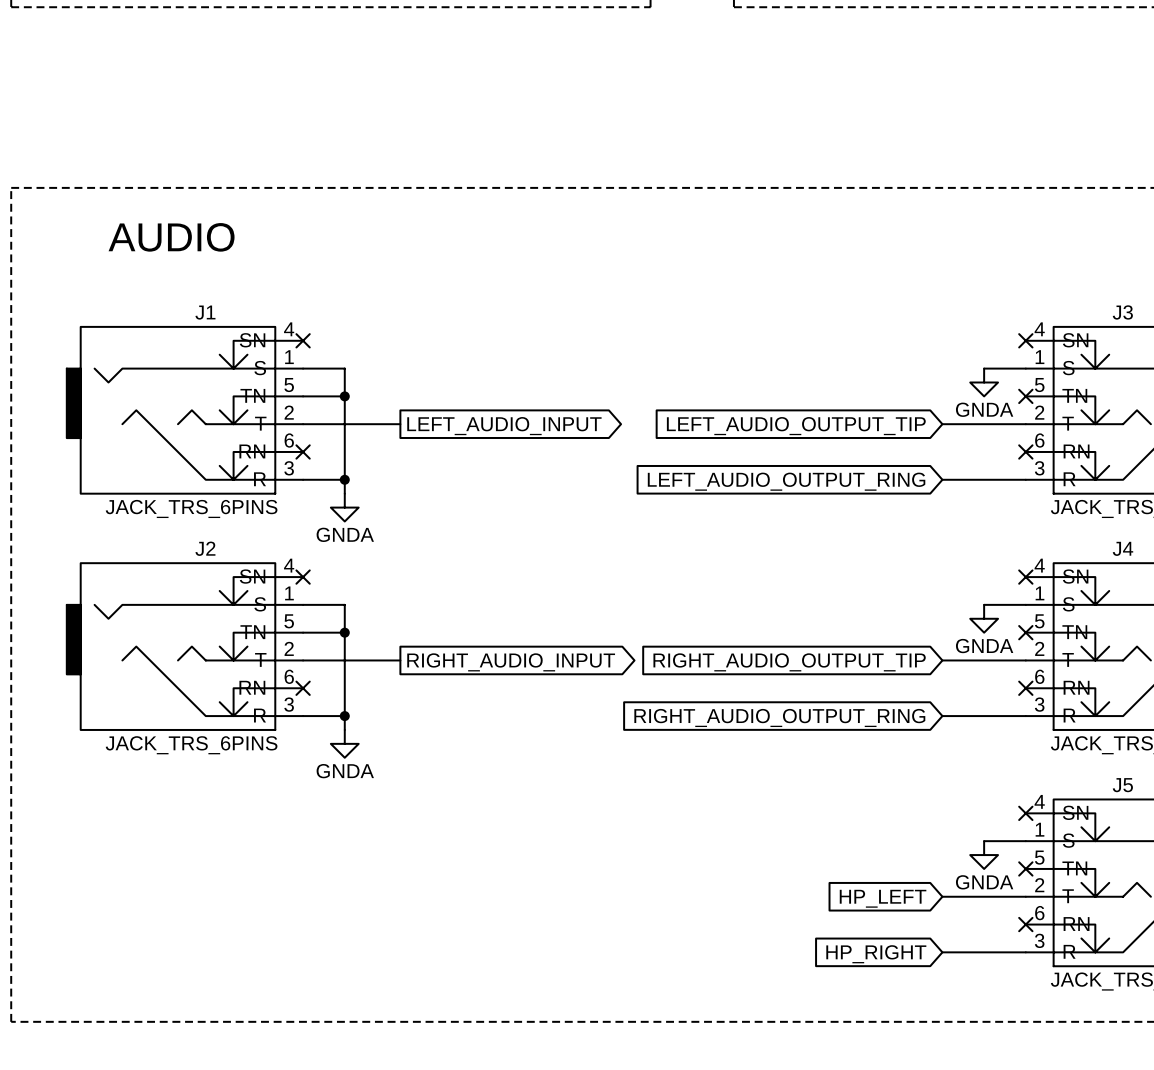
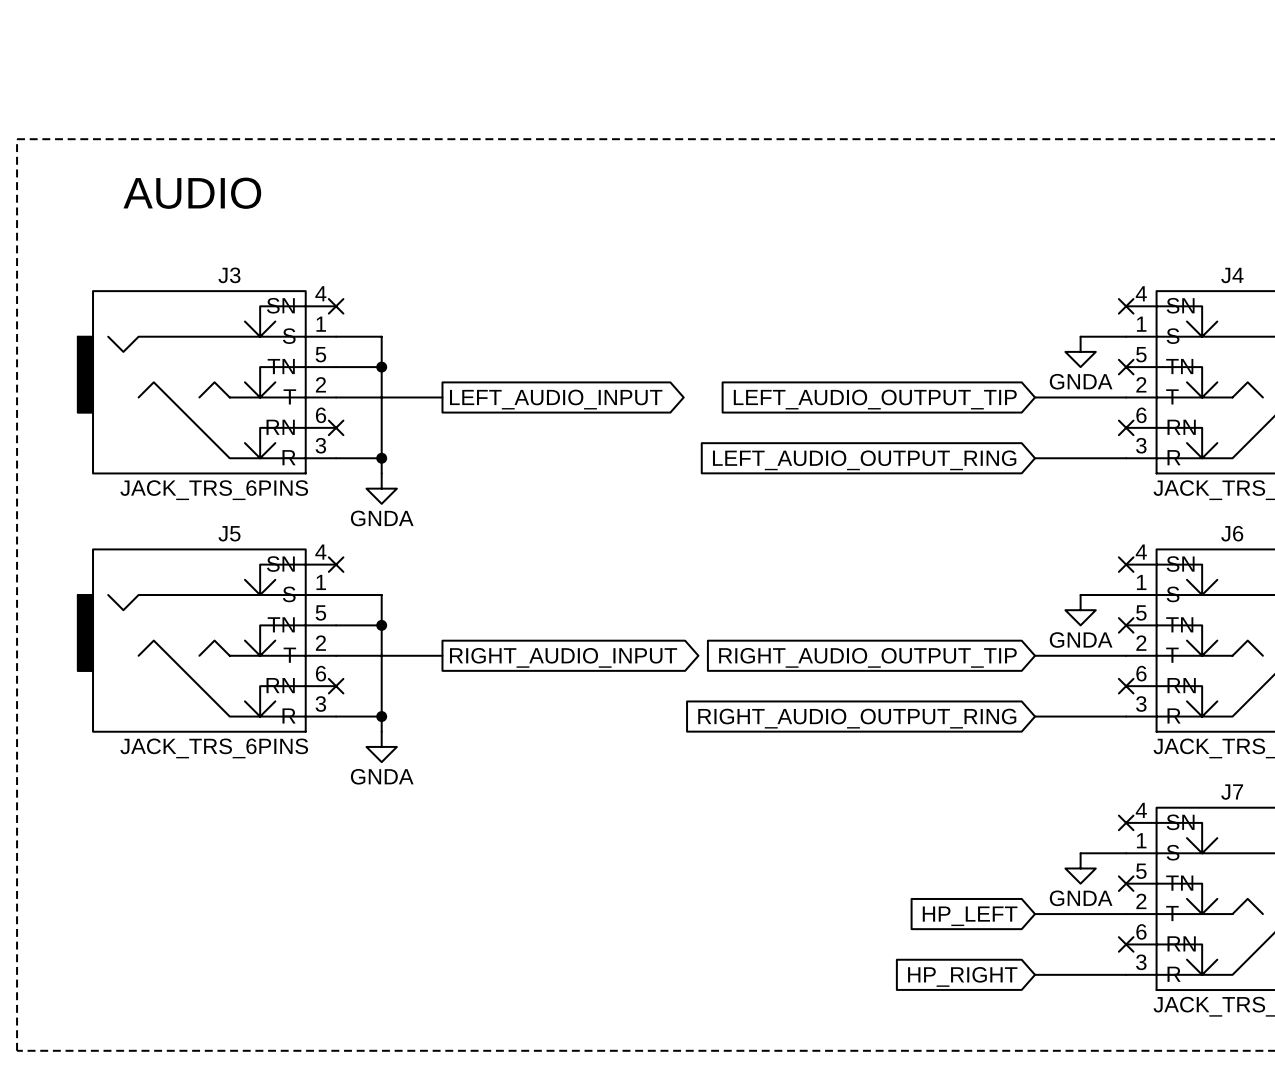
J1 name: J1 (205, 312) -> J3 (229, 275)
J3 name: J3 (1122, 312) -> J4 (1232, 275)
J2 name: J2 (205, 548) -> J5 (229, 533)
J4 name: J4 (1122, 548) -> J6 (1232, 533)
J5 name: J5 (1122, 785) -> J7 (1232, 792)

